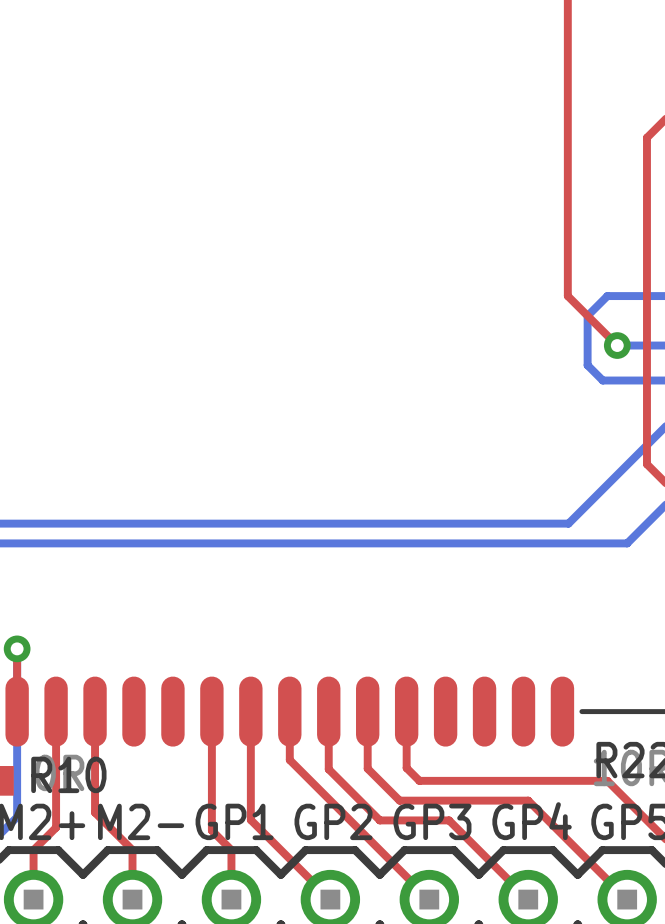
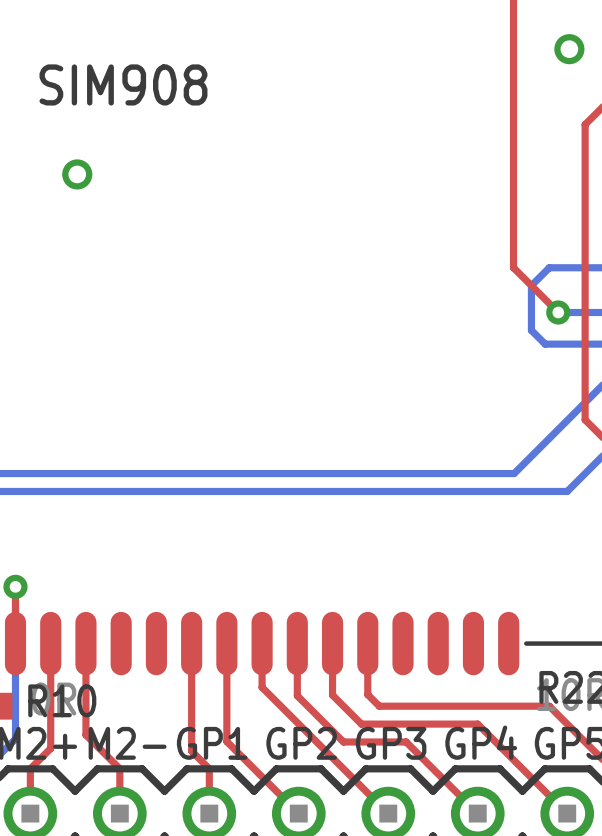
via: none -> (569, 49)
text: none -> SIM908 (123, 84)
via: none -> (77, 174)

